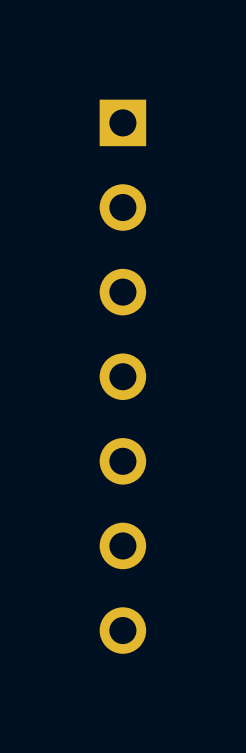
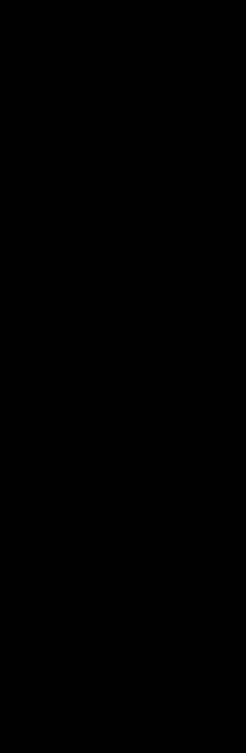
part: (122, 376) -> none

